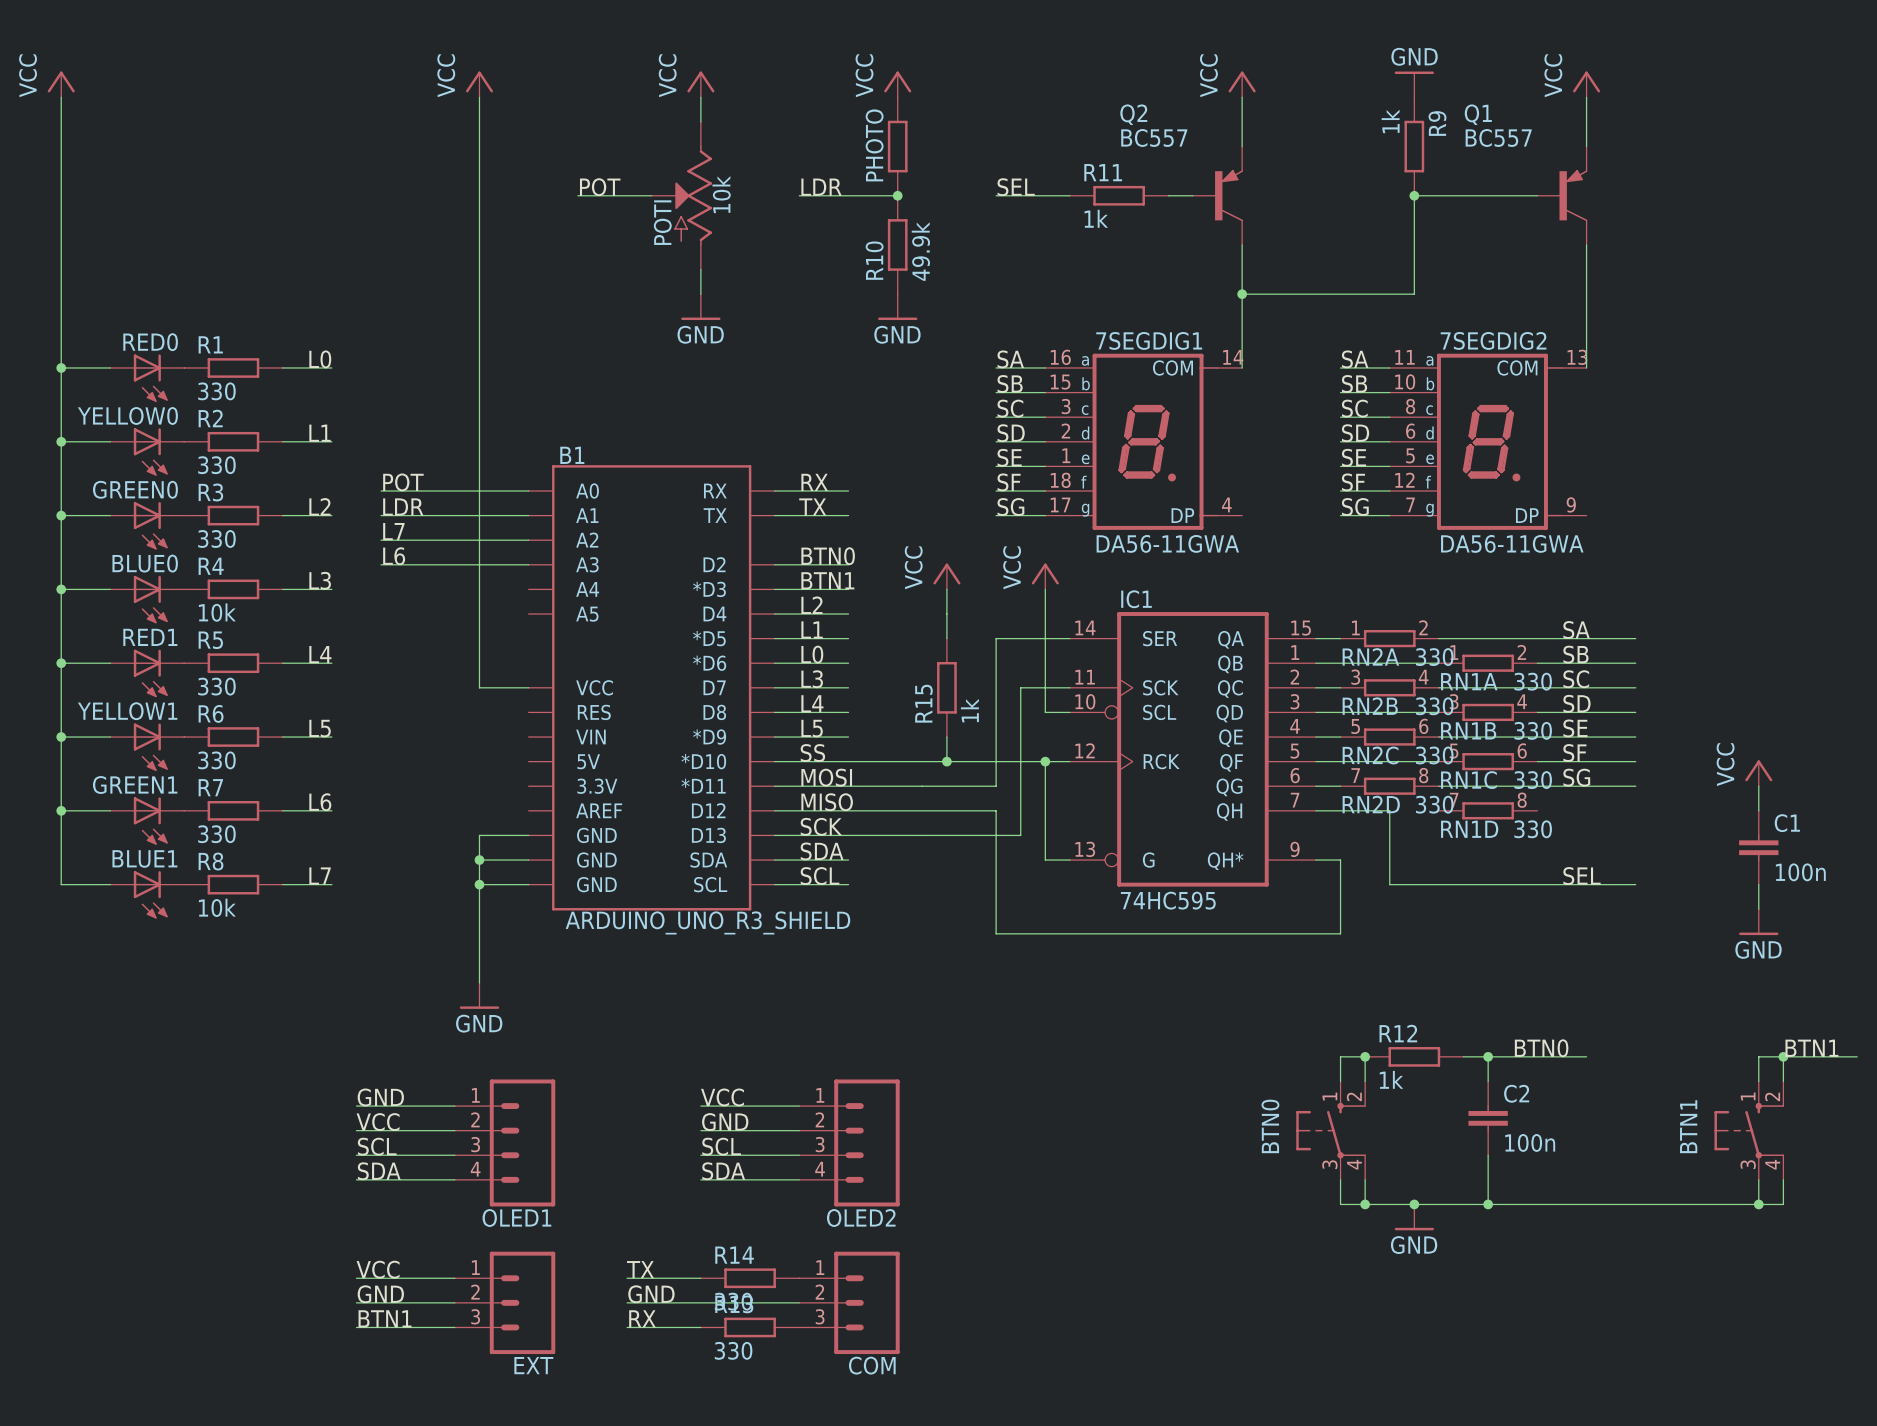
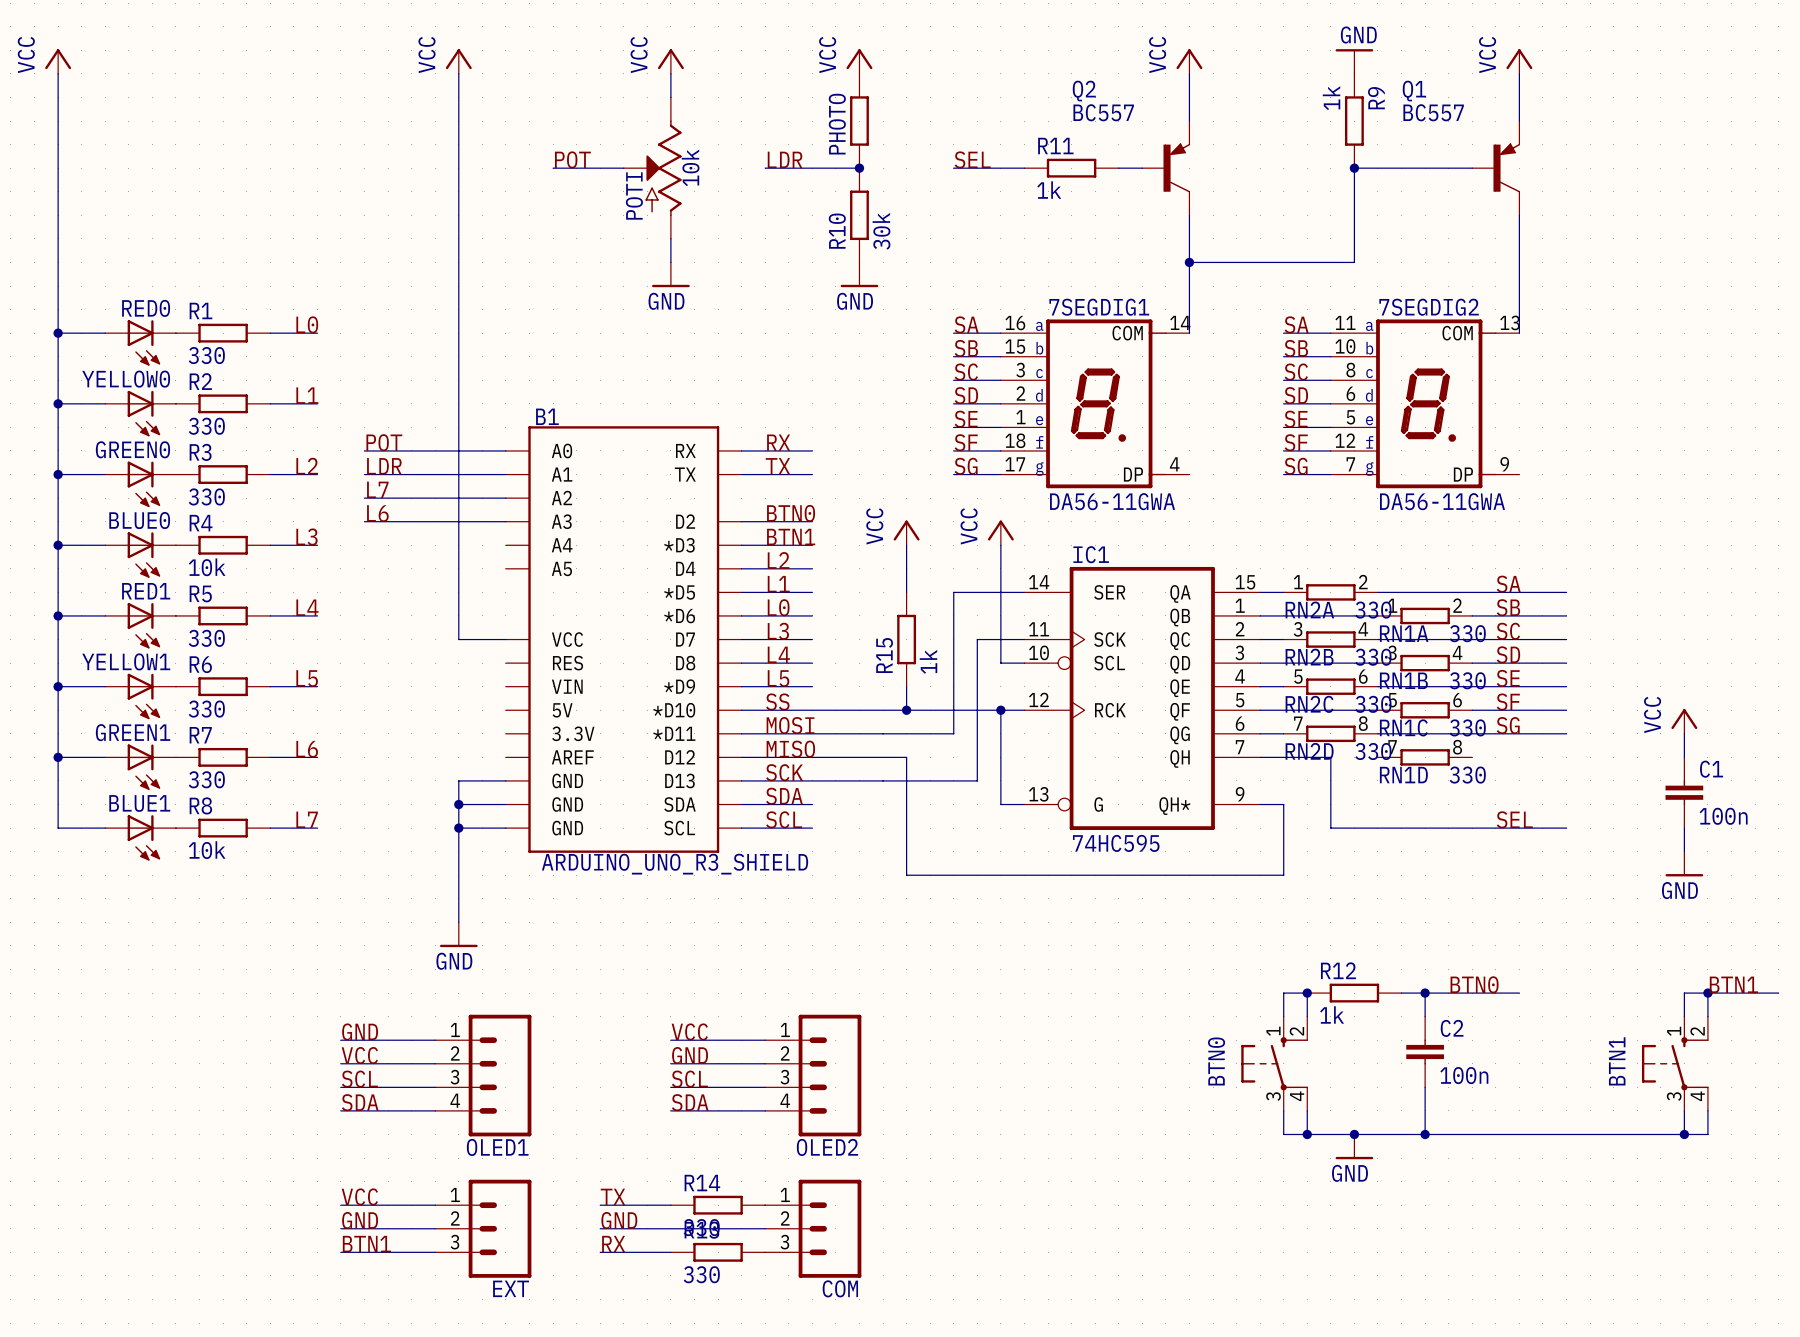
R10 value: 49.9k (920, 251) -> 30k (881, 231)
wire: (946, 810) (996, 810) (996, 933) -> (906, 757) (906, 875) (953, 875)

